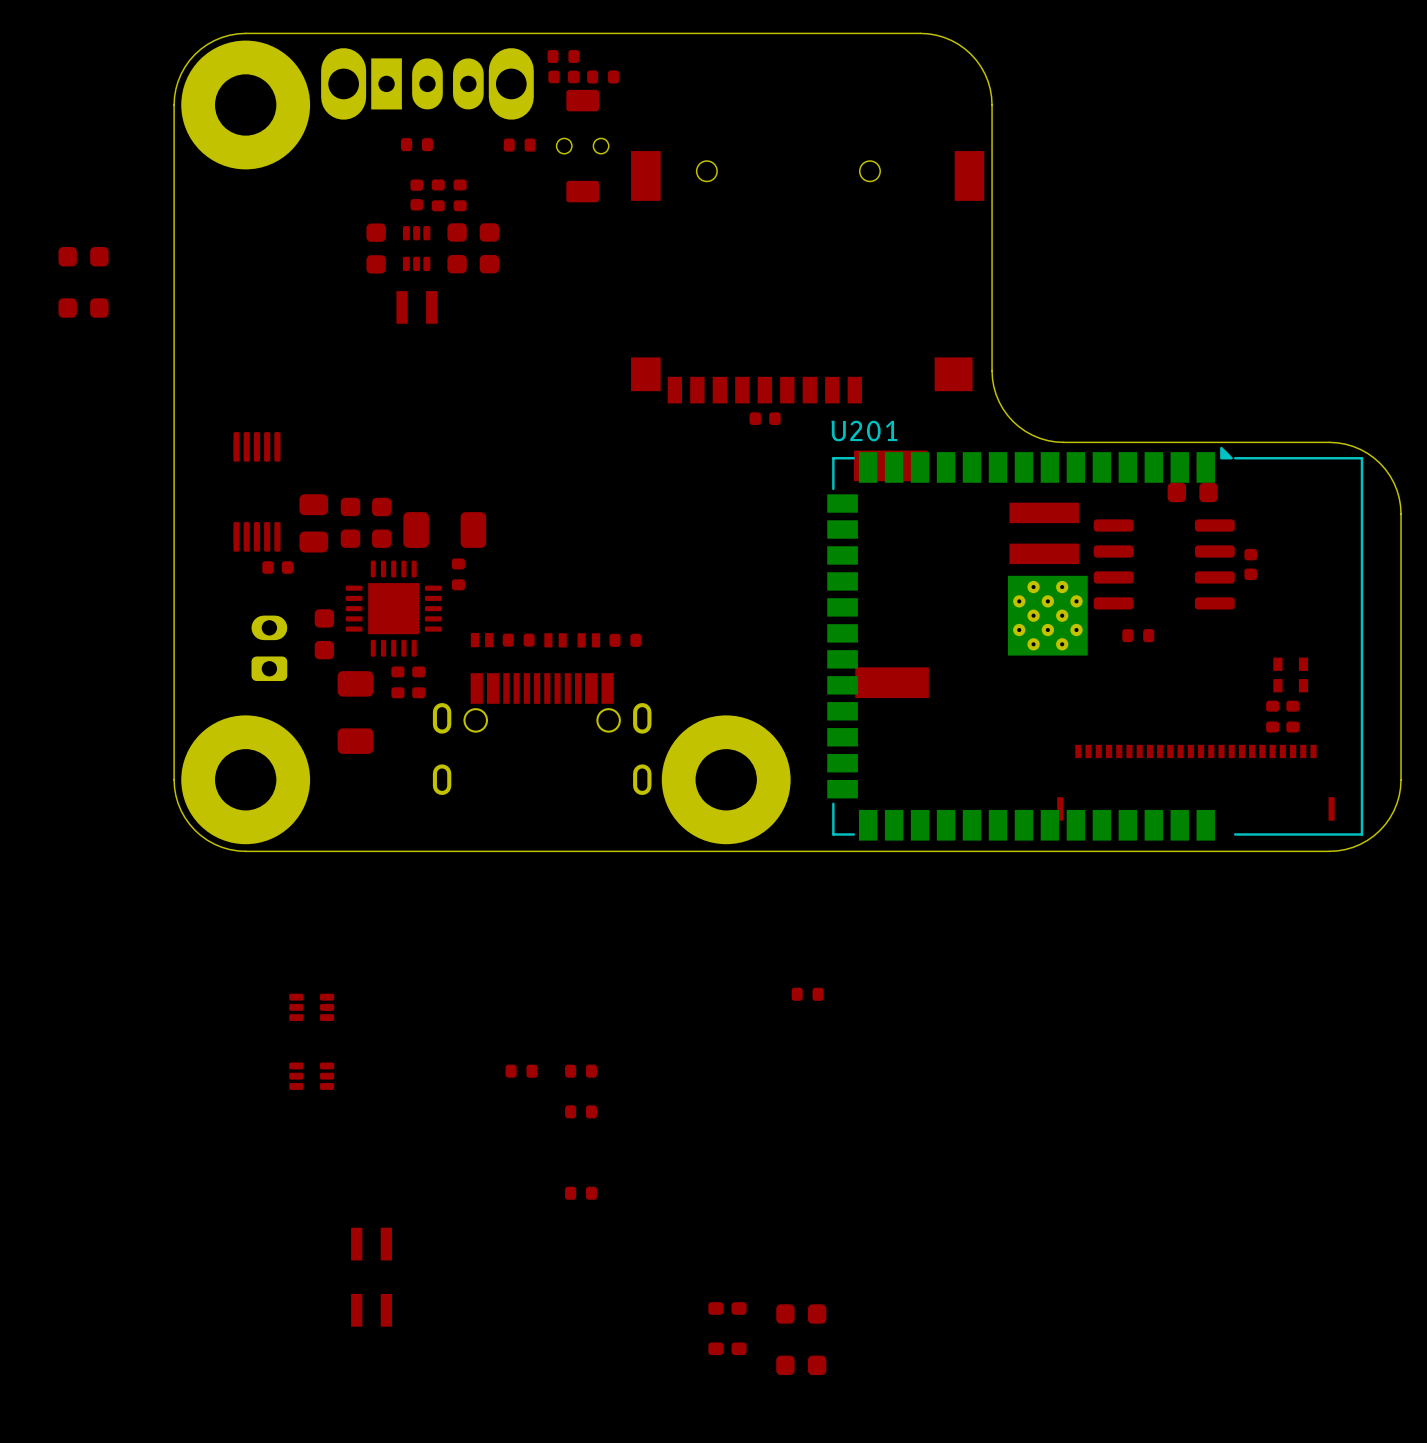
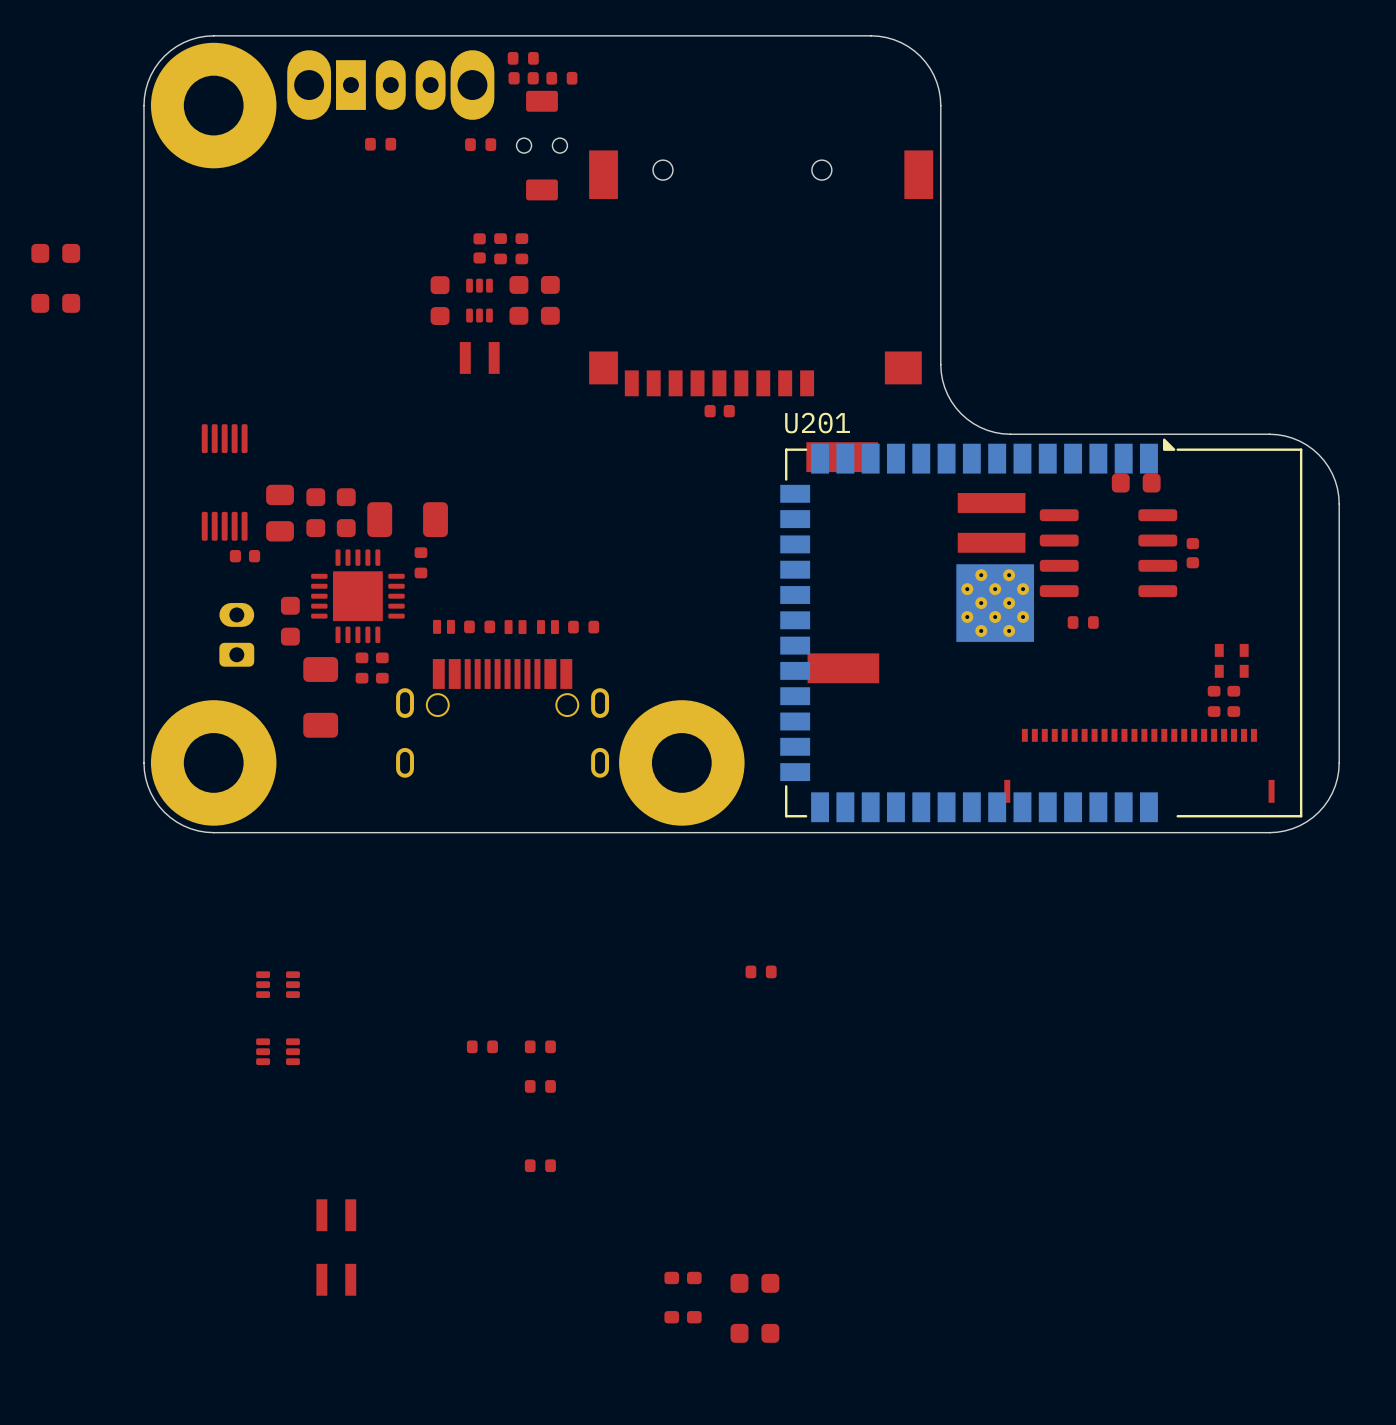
part position: (416, 194) -> (479, 248)
part: (438, 195) -> none
part: (460, 195) -> none
part: (376, 248) -> none
part position: (416, 248) -> (479, 300)
part: (457, 248) -> none
part: (489, 248) -> none
part: none -> (500, 248)
part: none -> (521, 248)
part: none -> (518, 300)
part: none -> (550, 300)
part: none -> (440, 300)
part position: (416, 307) -> (479, 357)

